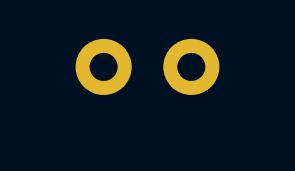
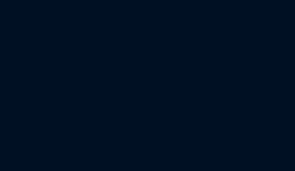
part: (147, 66) -> none

